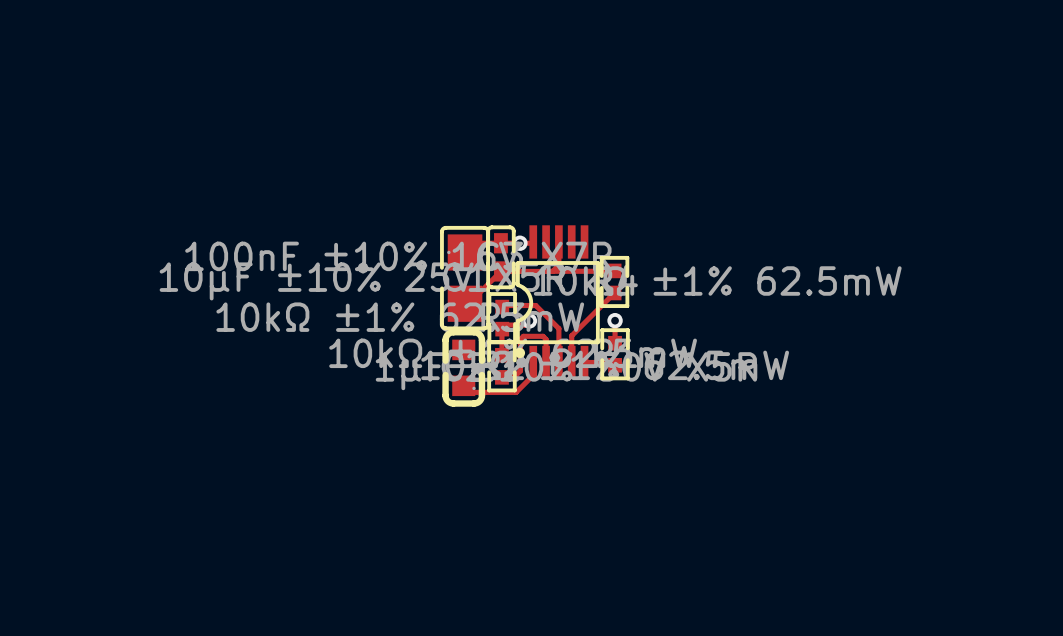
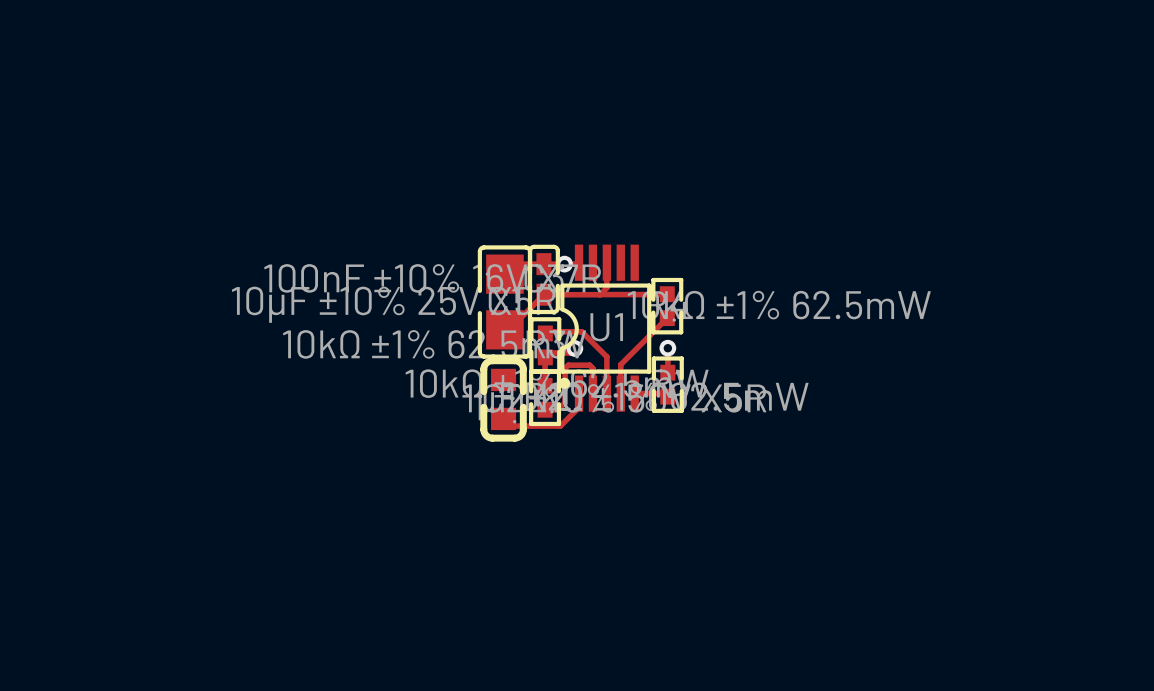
U1 name: none -> U1 (606, 327)

